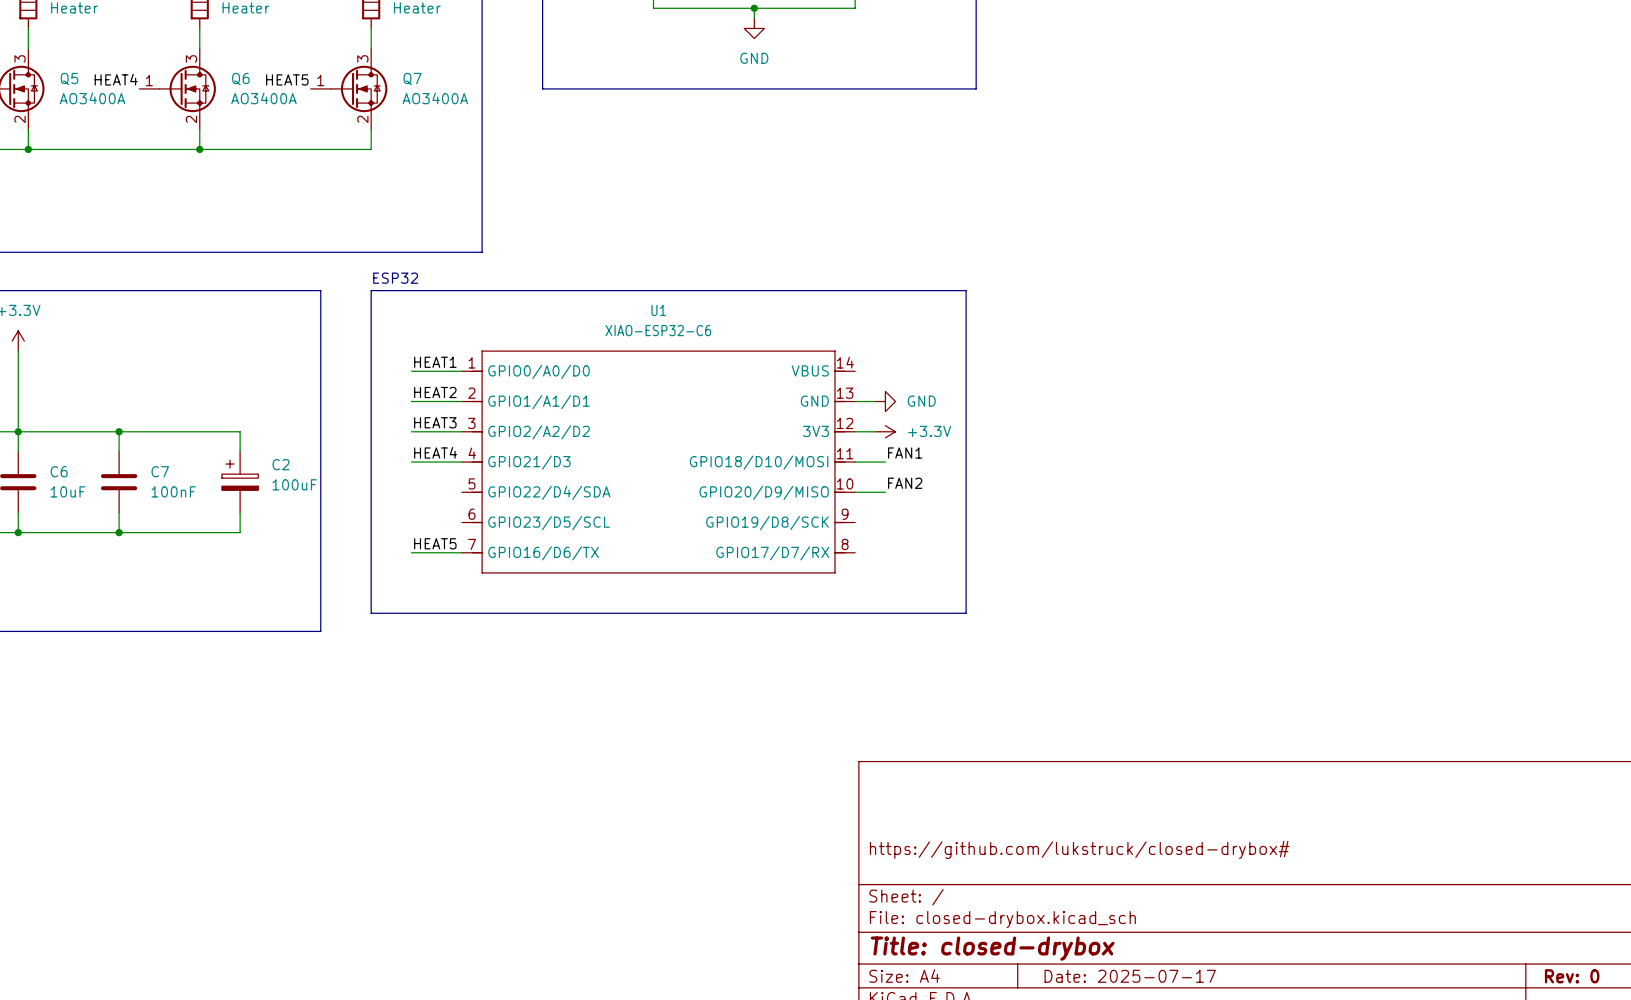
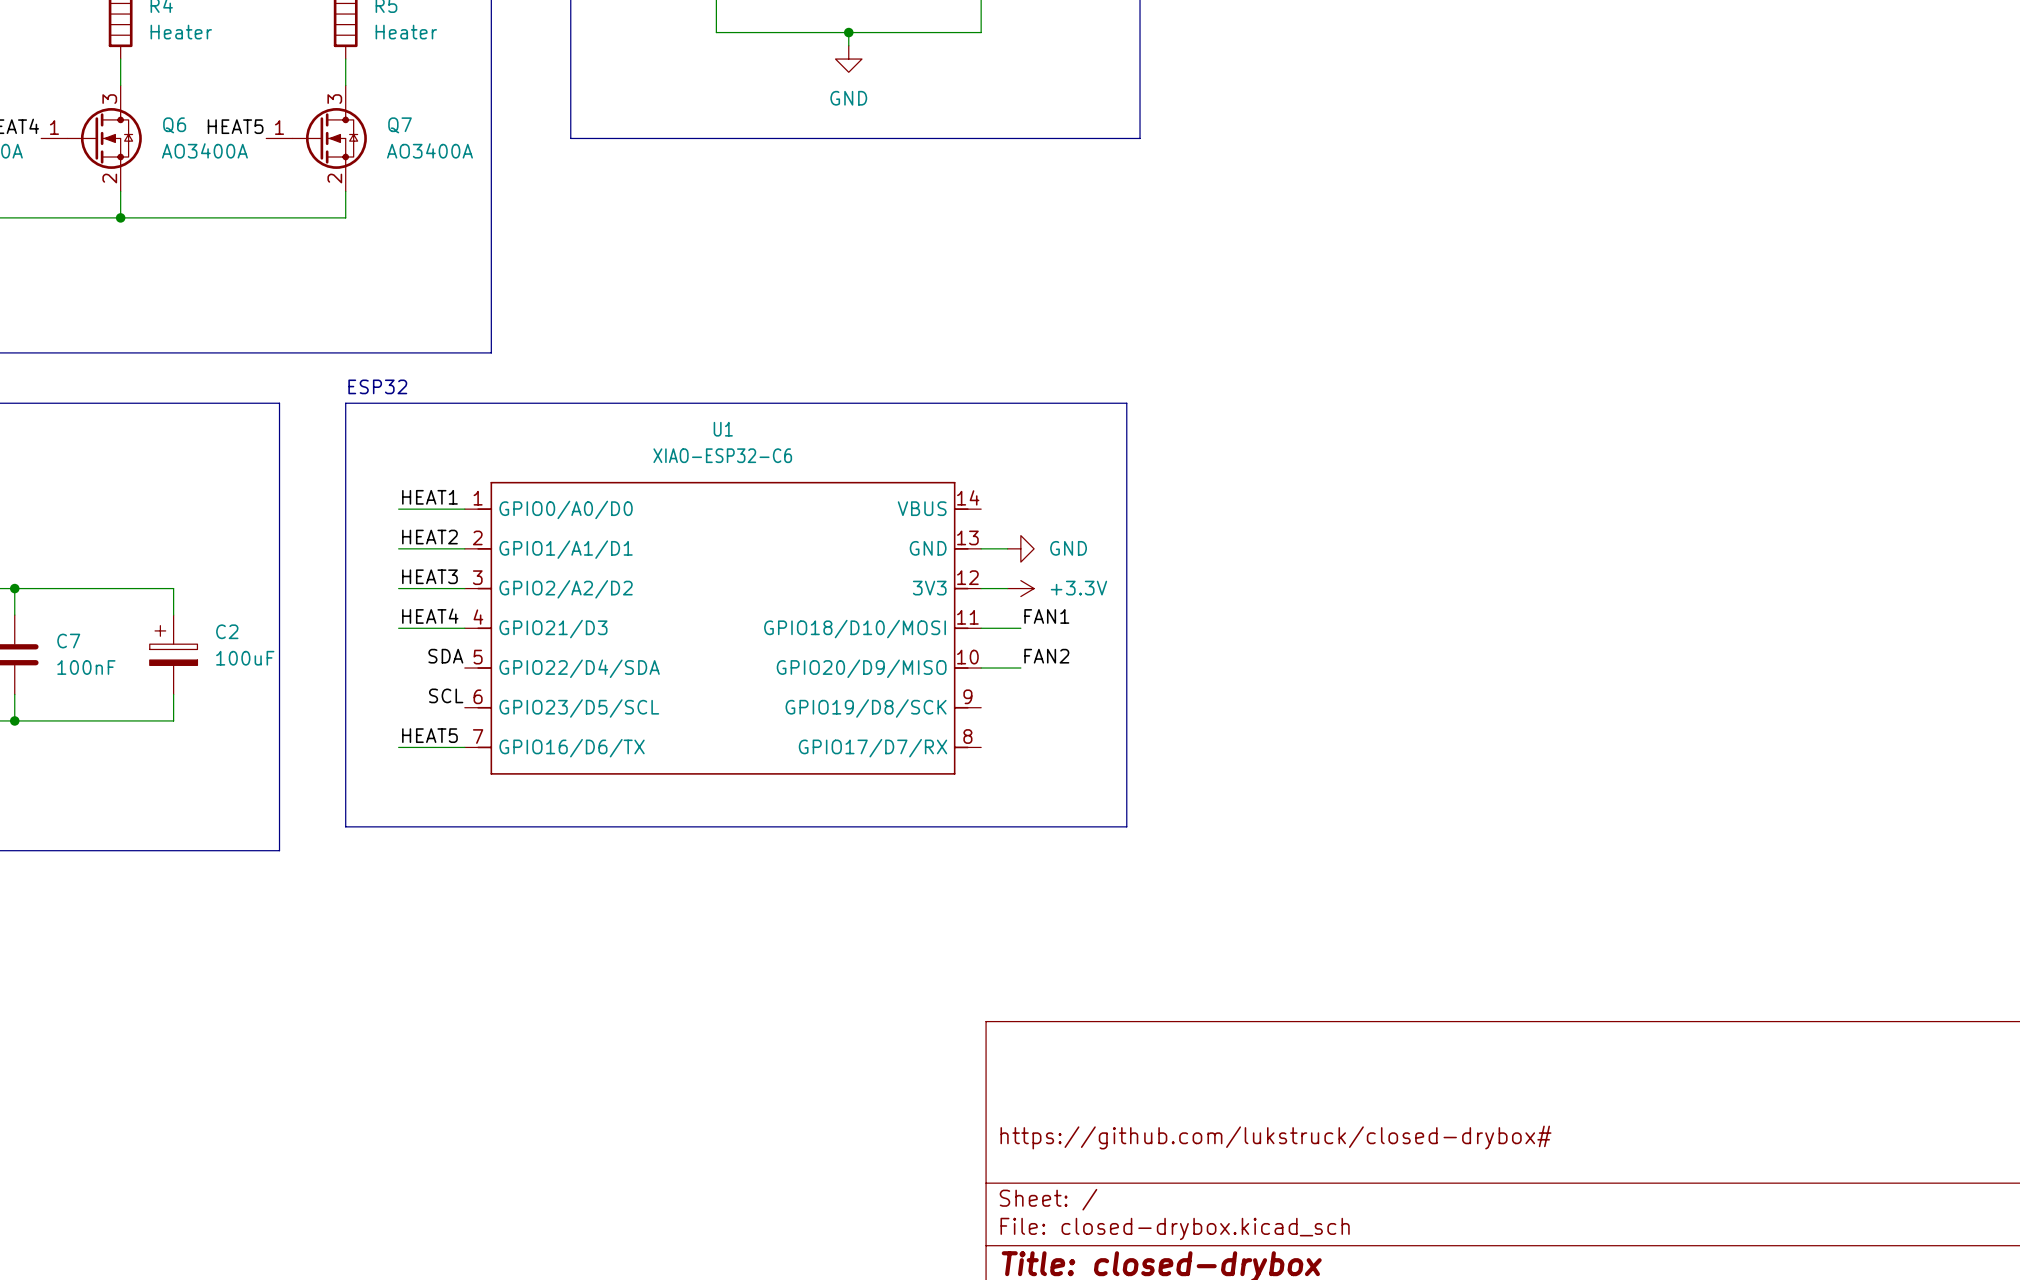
label: none -> SDA (445, 656)
label: none -> SCL (446, 695)

